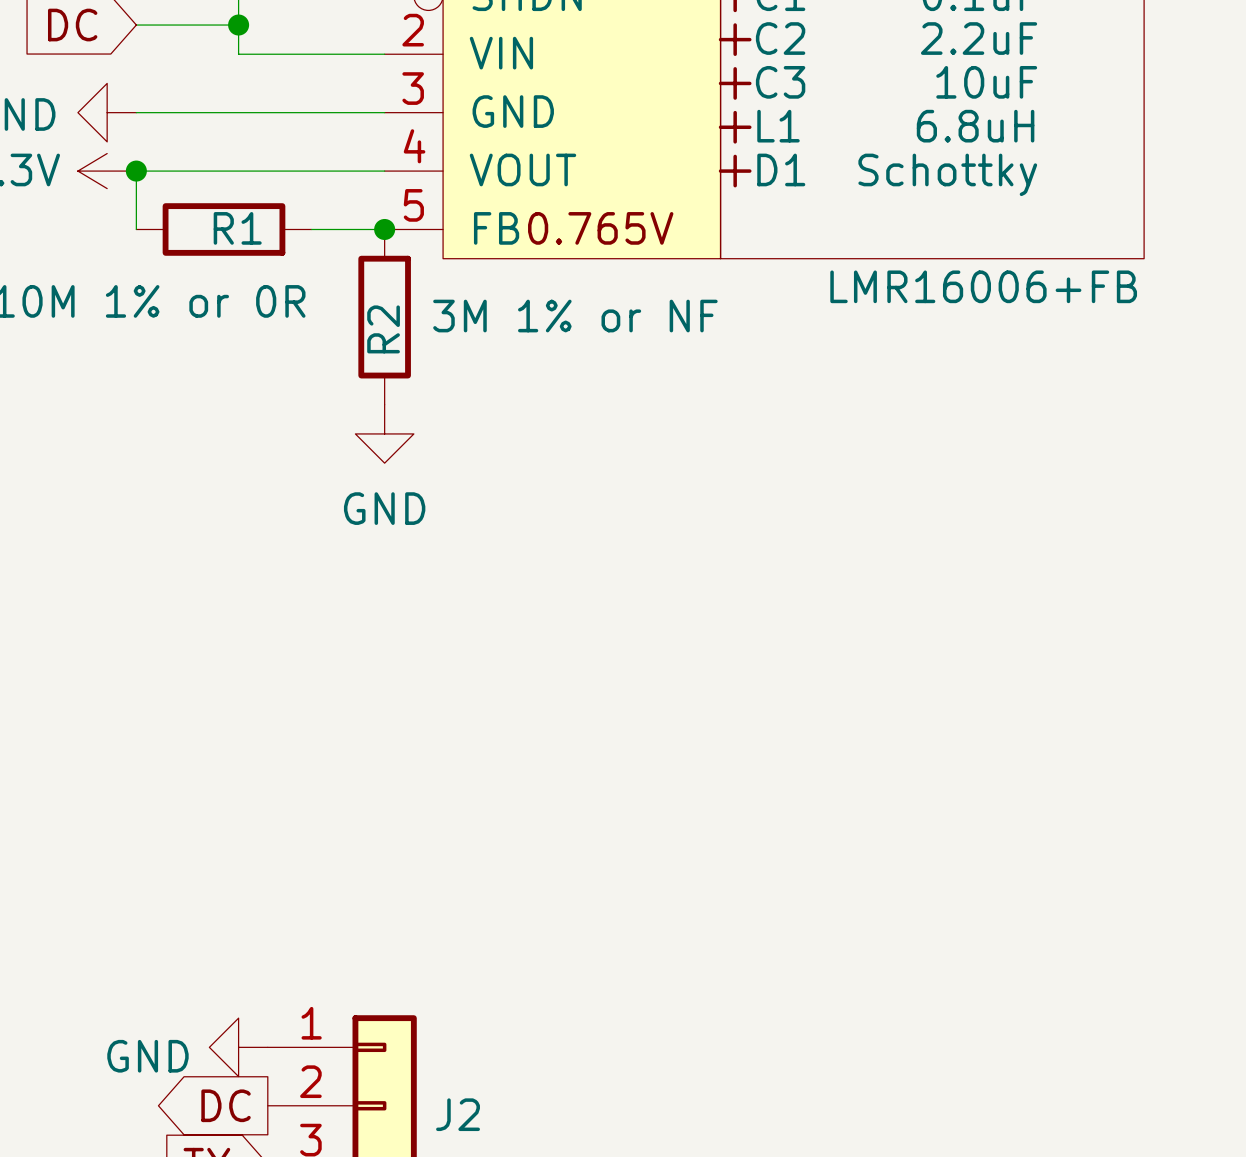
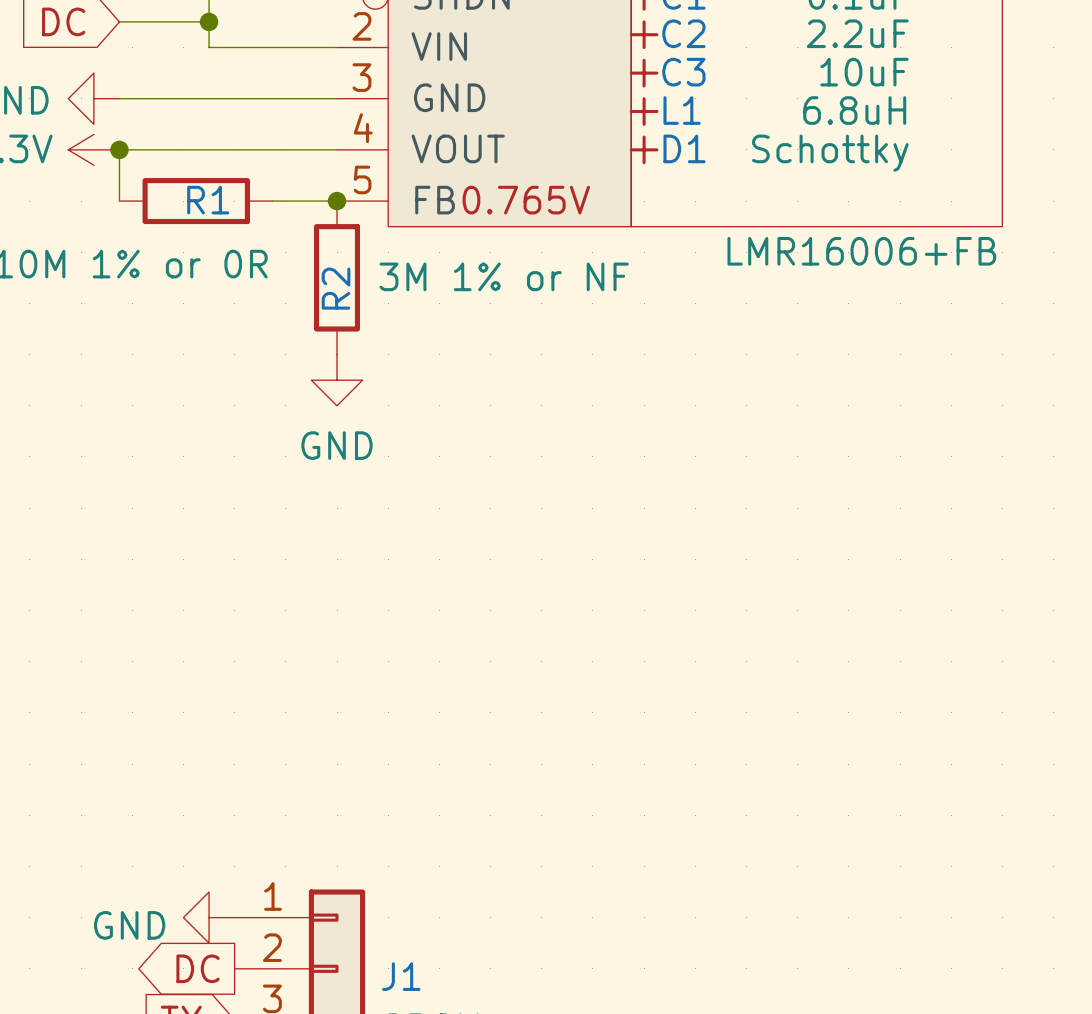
J2 name: J2 (458, 1114) -> J1 (401, 976)

